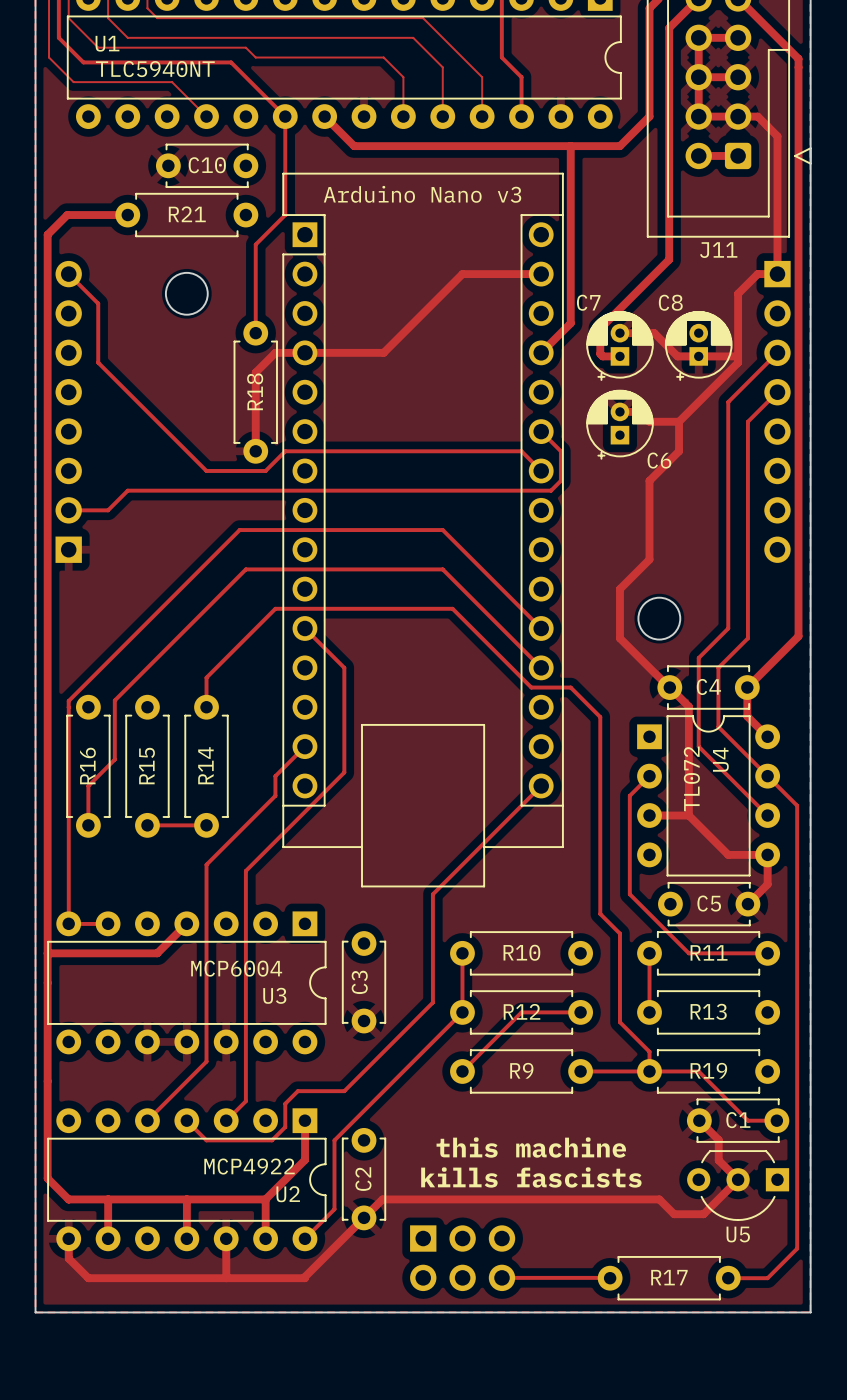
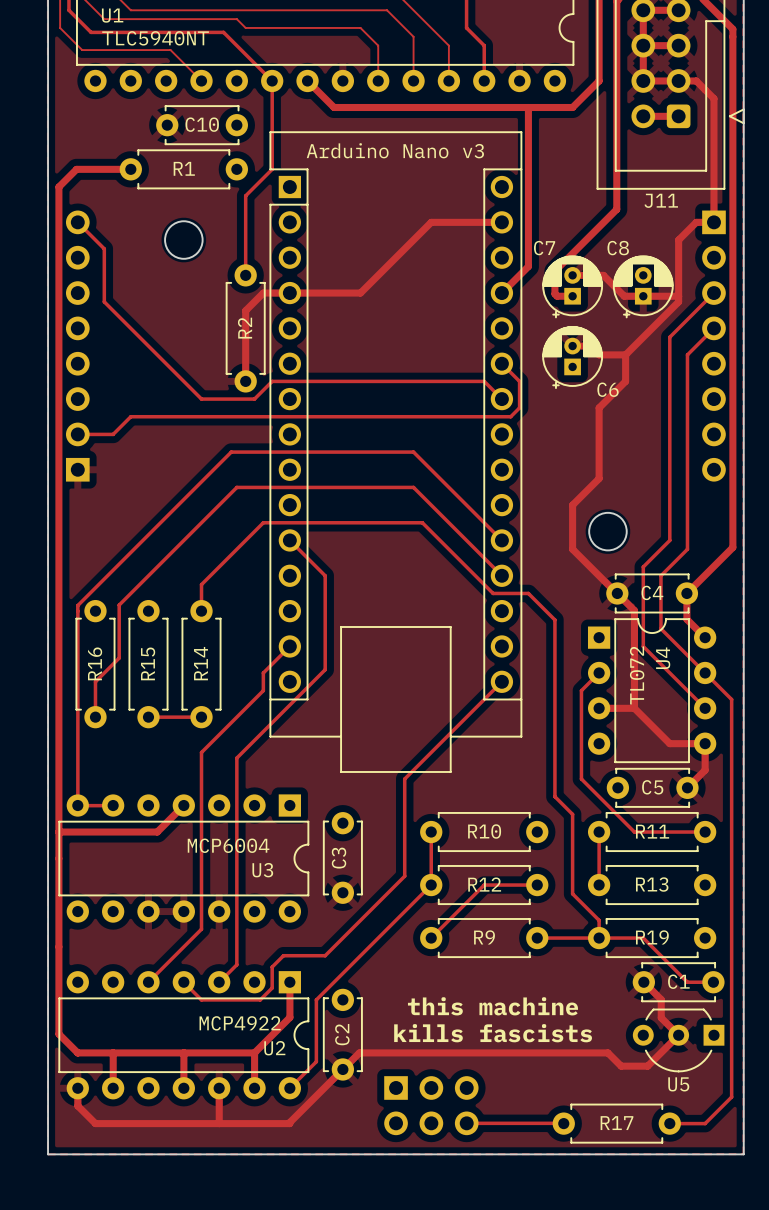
R21 name: R21 (187, 214) -> R1 (184, 168)
R18 name: R18 (255, 391) -> R2 (245, 328)

